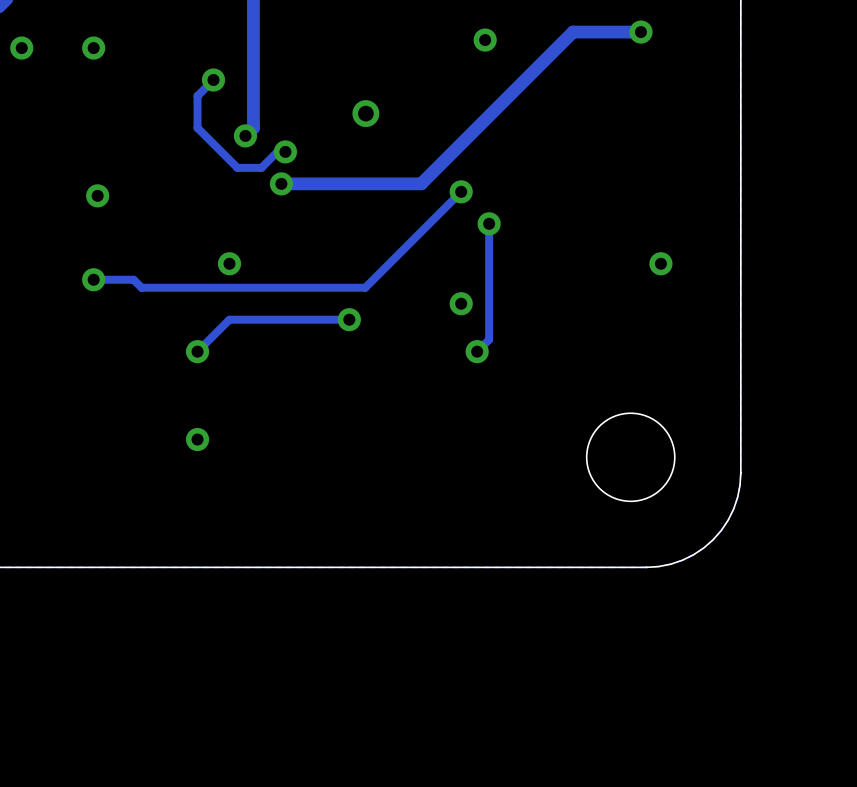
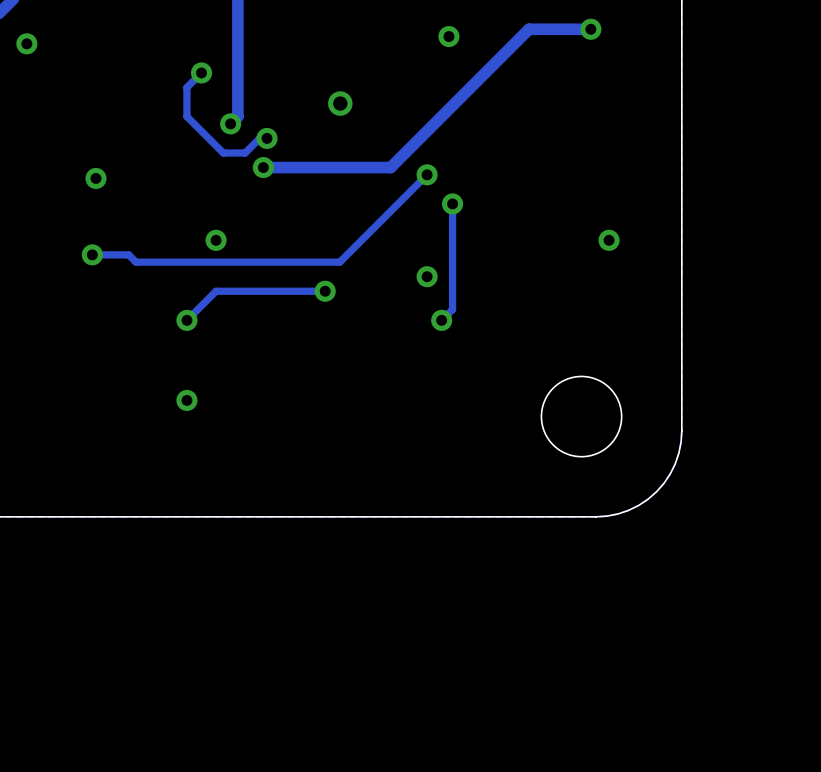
via: (93, 48) -> none

